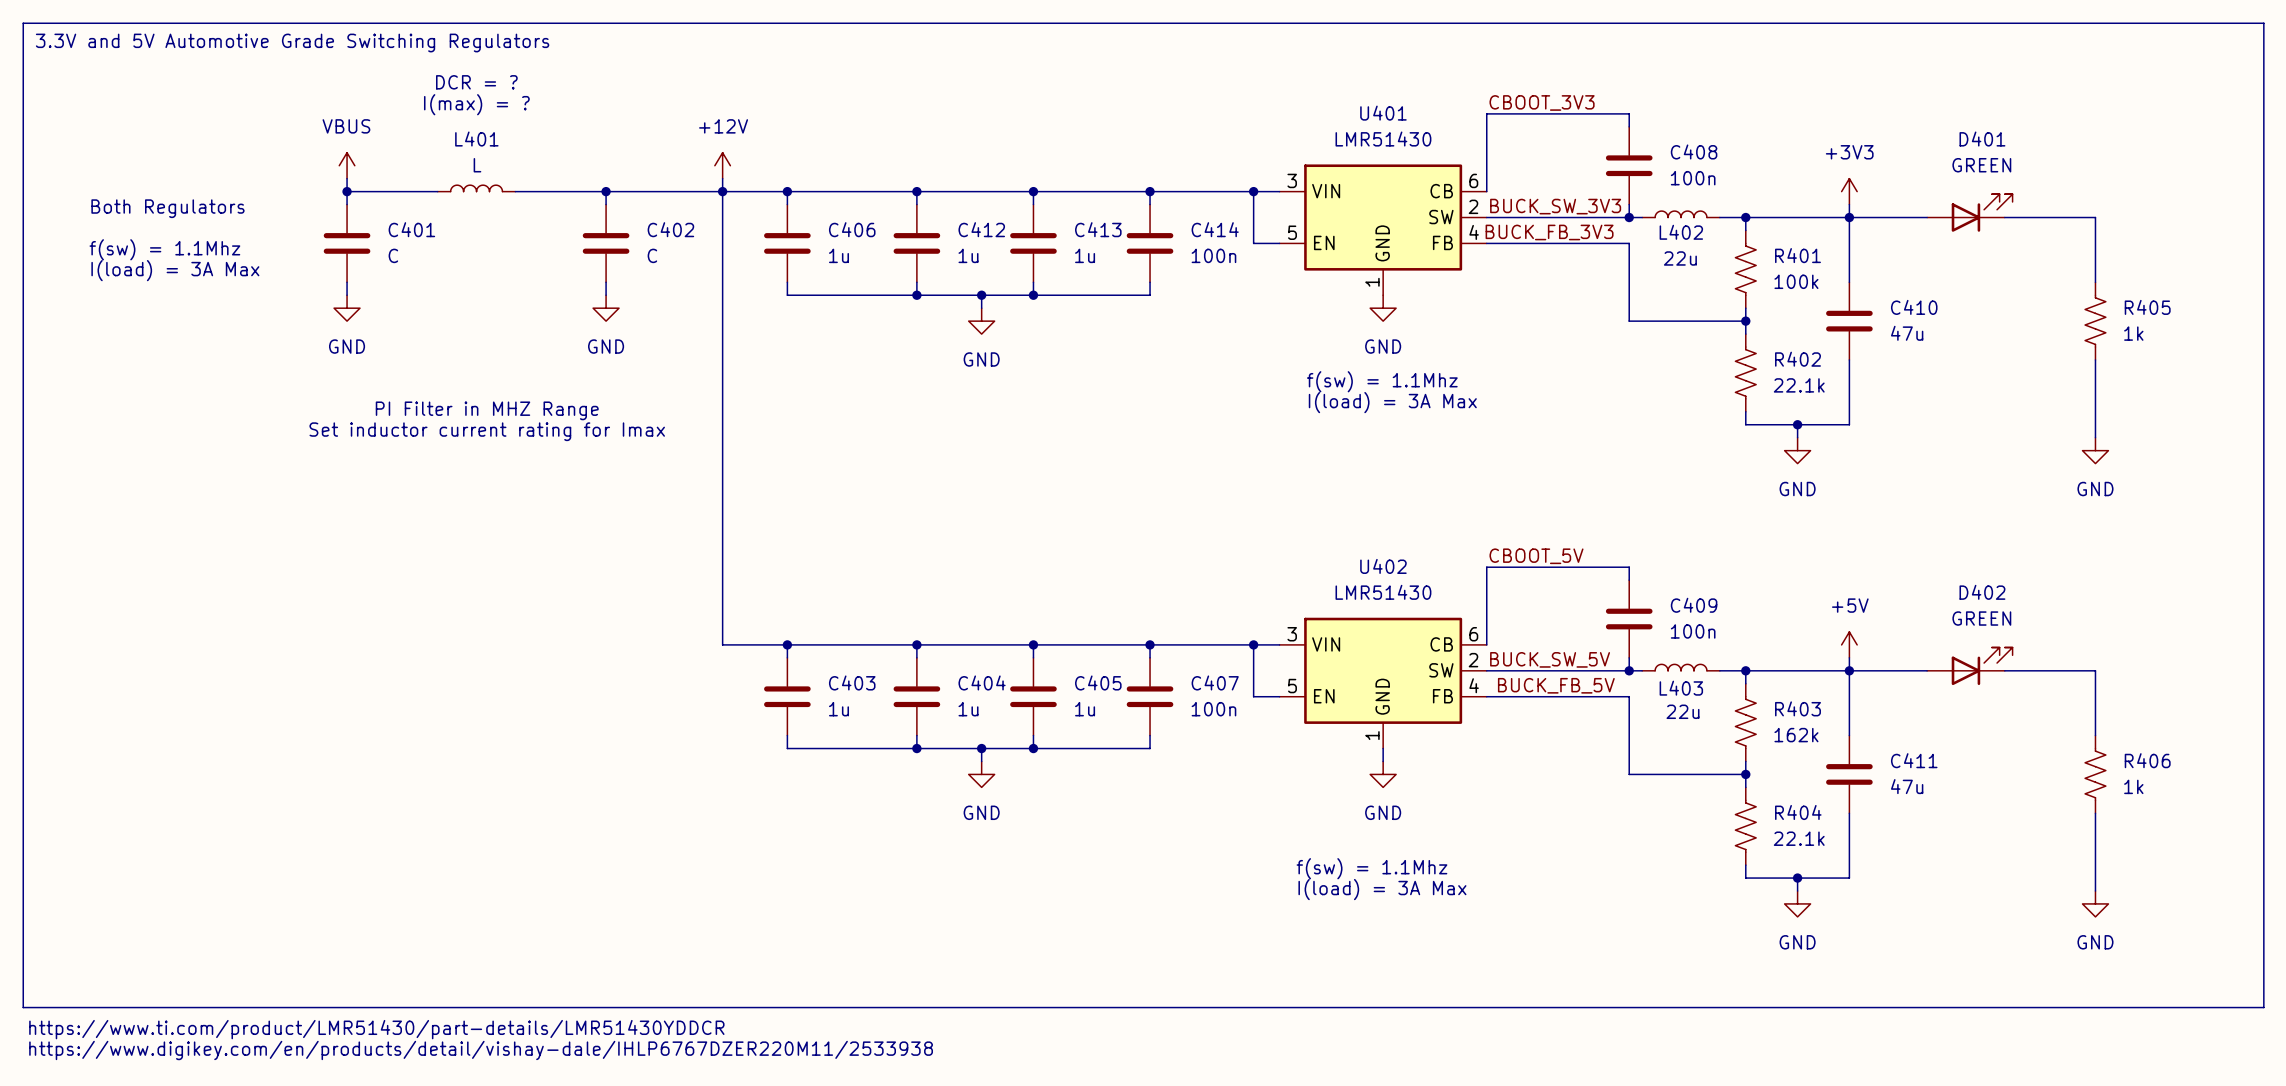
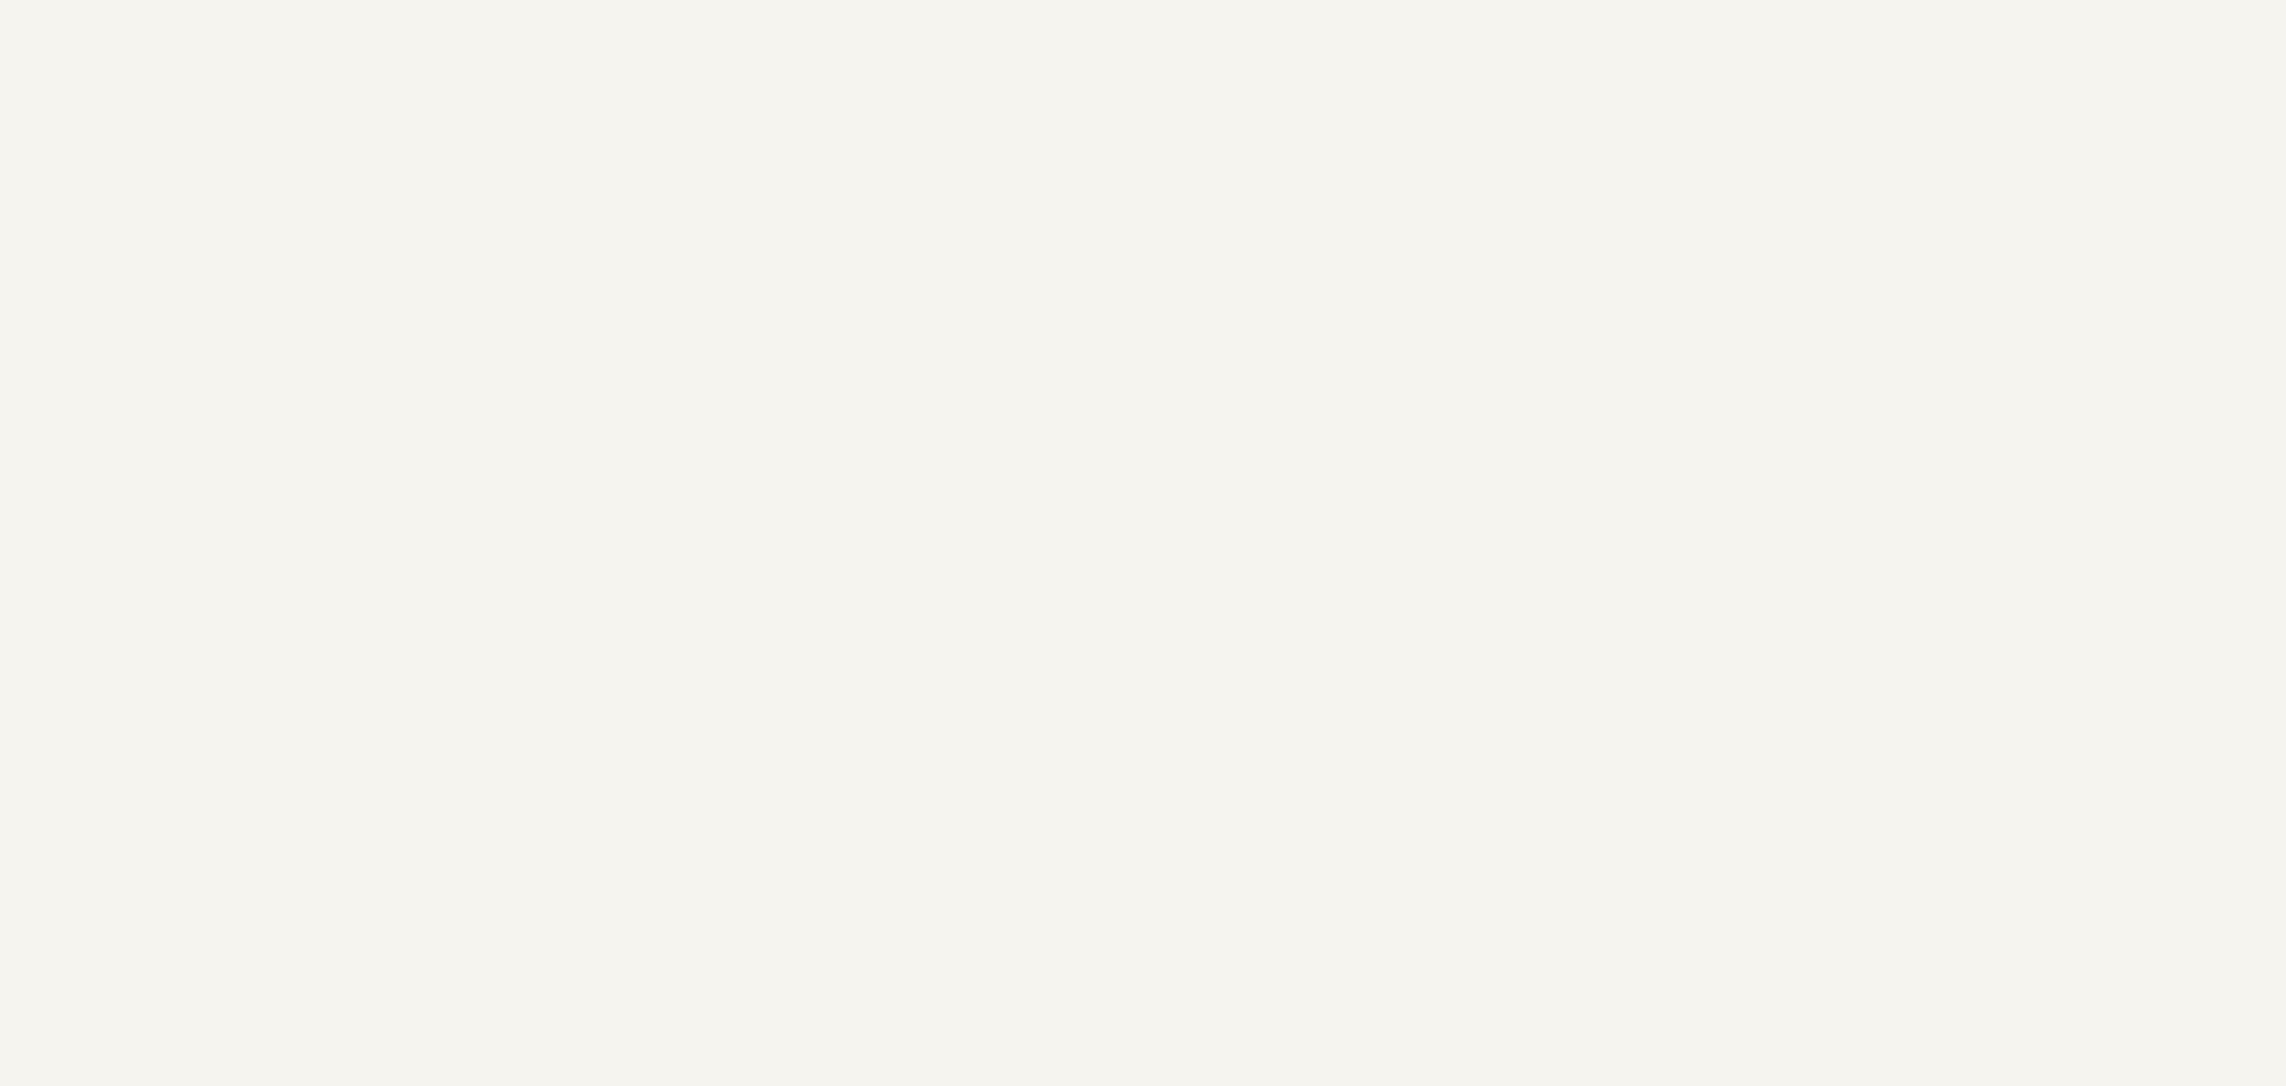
line: (23, 23) (2263, 23) (2263, 1007) (23, 1007) (23, 23) -> none
text: 3.3V and 5V Automotive Grade Switching Regulators (292, 42) -> none
text: DCR = ? (476, 82) -> none
label: CBOOT_3V3 (1542, 102) -> none
text: I(max) = ? (476, 104) -> none
wire: (1629, 126) (1629, 113) (1486, 113) (1486, 191) -> none
power symbol: VBUS (347, 165) -> none
power symbol: +12V (722, 165) -> none
C408: 100n (1629, 165) -> none
wire: (347, 178) (347, 204) -> none
wire: (722, 178) (722, 644) (1279, 644) -> none
L401: L (476, 188) -> none
wire: (347, 191) (437, 191) -> none
junction: (347, 191) -> none
wire: (515, 191) (1279, 191) -> none
wire: (606, 191) (606, 204) -> none
junction: (606, 191) -> none
junction: (722, 191) -> none
wire: (787, 191) (787, 204) -> none
junction: (787, 191) -> none
wire: (916, 191) (916, 204) -> none
junction: (916, 191) -> none
wire: (1033, 191) (1033, 204) -> none
junction: (1033, 191) -> none
wire: (1150, 191) (1150, 204) -> none
junction: (1150, 191) -> none
wire: (1253, 191) (1253, 243) (1279, 243) -> none
junction: (1253, 191) -> none
power symbol: +3V3 (1849, 191) -> none
wire: (1629, 204) (1629, 217) -> none
wire: (1849, 204) (1849, 282) -> none
label: BUCK_SW_3V3 (1555, 206) -> none
text: Both Regulators (167, 208) -> none
D401: GREEN (1969, 212) -> none
L402: 22u (1681, 214) -> none
wire: (1486, 217) (1642, 217) -> none
junction: (1629, 217) -> none
wire: (1719, 217) (1927, 217) -> none
wire: (1745, 217) (1745, 230) -> none
junction: (1745, 217) -> none
junction: (1849, 217) -> none
wire: (2004, 217) (2095, 217) (2095, 282) -> none
U401: LMR51430 (1383, 229) -> none
label: BUCK_FB_3V3 (1549, 232) -> none
C401: C (347, 243) -> none
C402: C (606, 243) -> none
C406: 1u (787, 243) -> none
C412: 1u (916, 243) -> none
C413: 1u (1033, 243) -> none
C414: 100n (1150, 243) -> none
wire: (1486, 243) (1629, 243) (1629, 321) (1745, 321) -> none
text: f(sw) = 1.1Mhz (164, 249) -> none
R401: 100k (1745, 269) -> none
text: I(load) = 3A Max (175, 270) -> none
wire: (347, 282) (347, 295) -> none
wire: (606, 282) (606, 295) -> none
wire: (787, 282) (787, 295) (1150, 295) (1150, 282) -> none
wire: (916, 282) (916, 295) -> none
wire: (1033, 282) (1033, 295) -> none
junction: (916, 295) -> none
wire: (981, 295) (981, 308) -> none
junction: (981, 295) -> none
junction: (1033, 295) -> none
power symbol: GND (347, 308) -> none
power symbol: GND (606, 308) -> none
power symbol: GND (1383, 308) -> none
wire: (1745, 308) (1745, 334) -> none
power symbol: GND (981, 321) -> none
junction: (1745, 321) -> none
C410: 47u (1849, 321) -> none
R405: 1k (2095, 321) -> none
wire: (1849, 359) (1849, 424) (1745, 424) (1745, 411) -> none
wire: (2095, 359) (2095, 437) -> none
R402: 22.1k (1745, 372) -> none
text: f(sw) = 1.1Mhz (1382, 381) -> none
text: I(load) = 3A Max (1392, 402) -> none
text: PI Filter in MHZ Range (487, 410) -> none
wire: (1797, 424) (1797, 437) -> none
junction: (1797, 424) -> none
text: Set inductor current rating for Imax (487, 431) -> none
power symbol: GND (1797, 450) -> none
power symbol: GND (2095, 450) -> none
label: CBOOT_5V (1536, 556) -> none
wire: (1629, 580) (1629, 567) (1486, 567) (1486, 644) -> none
C409: 100n (1629, 619) -> none
wire: (787, 644) (787, 657) -> none
junction: (787, 644) -> none
wire: (916, 644) (916, 657) -> none
junction: (916, 644) -> none
wire: (1033, 644) (1033, 657) -> none
junction: (1033, 644) -> none
wire: (1150, 644) (1150, 657) -> none
junction: (1150, 644) -> none
wire: (1253, 644) (1253, 696) (1279, 696) -> none
junction: (1253, 644) -> none
power symbol: +5V (1849, 644) -> none
wire: (1629, 657) (1629, 670) -> none
wire: (1849, 657) (1849, 735) -> none
label: BUCK_SW_5V (1550, 659) -> none
D402: GREEN (1969, 666) -> none
L403: 22u (1681, 667) -> none
wire: (1486, 670) (1642, 670) -> none
junction: (1629, 670) -> none
wire: (1719, 670) (1927, 670) -> none
wire: (1745, 670) (1745, 683) -> none
junction: (1745, 670) -> none
junction: (1849, 670) -> none
wire: (2004, 670) (2095, 670) (2095, 735) -> none
U402: LMR51430 (1383, 683) -> none
label: BUCK_FB_5V (1556, 685) -> none
C403: 1u (787, 696) -> none
C404: 1u (916, 696) -> none
C405: 1u (1033, 696) -> none
C407: 100n (1150, 696) -> none
wire: (1486, 696) (1629, 696) (1629, 774) (1745, 774) -> none
R403: 162k (1745, 722) -> none
wire: (787, 735) (787, 748) (1150, 748) (1150, 735) -> none
wire: (916, 735) (916, 748) -> none
wire: (1033, 735) (1033, 748) -> none
junction: (916, 748) -> none
wire: (981, 748) (981, 761) -> none
junction: (981, 748) -> none
junction: (1033, 748) -> none
wire: (1383, 748) (1383, 761) -> none
wire: (1745, 761) (1745, 787) -> none
power symbol: GND (981, 774) -> none
power symbol: GND (1383, 774) -> none
junction: (1745, 774) -> none
C411: 47u (1849, 774) -> none
R406: 1k (2095, 774) -> none
wire: (1849, 813) (1849, 878) (1745, 878) (1745, 865) -> none
wire: (2095, 813) (2095, 890) -> none
R404: 22.1k (1745, 826) -> none
text: f(sw) = 1.1Mhz (1371, 868) -> none
wire: (1797, 878) (1797, 890) -> none
junction: (1797, 878) -> none
text: I(load) = 3A Max (1382, 889) -> none
power symbol: GND (1797, 903) -> none
power symbol: GND (2095, 903) -> none
text: https://www.ti.com/product/LMR51430/part-details/LMR51430YDDCR (376, 1029) -> none
text: https://www.digikey.com/en/products/detail/vishay-dale/IHLP6767DZER220M11/2533938 (481, 1050) -> none

